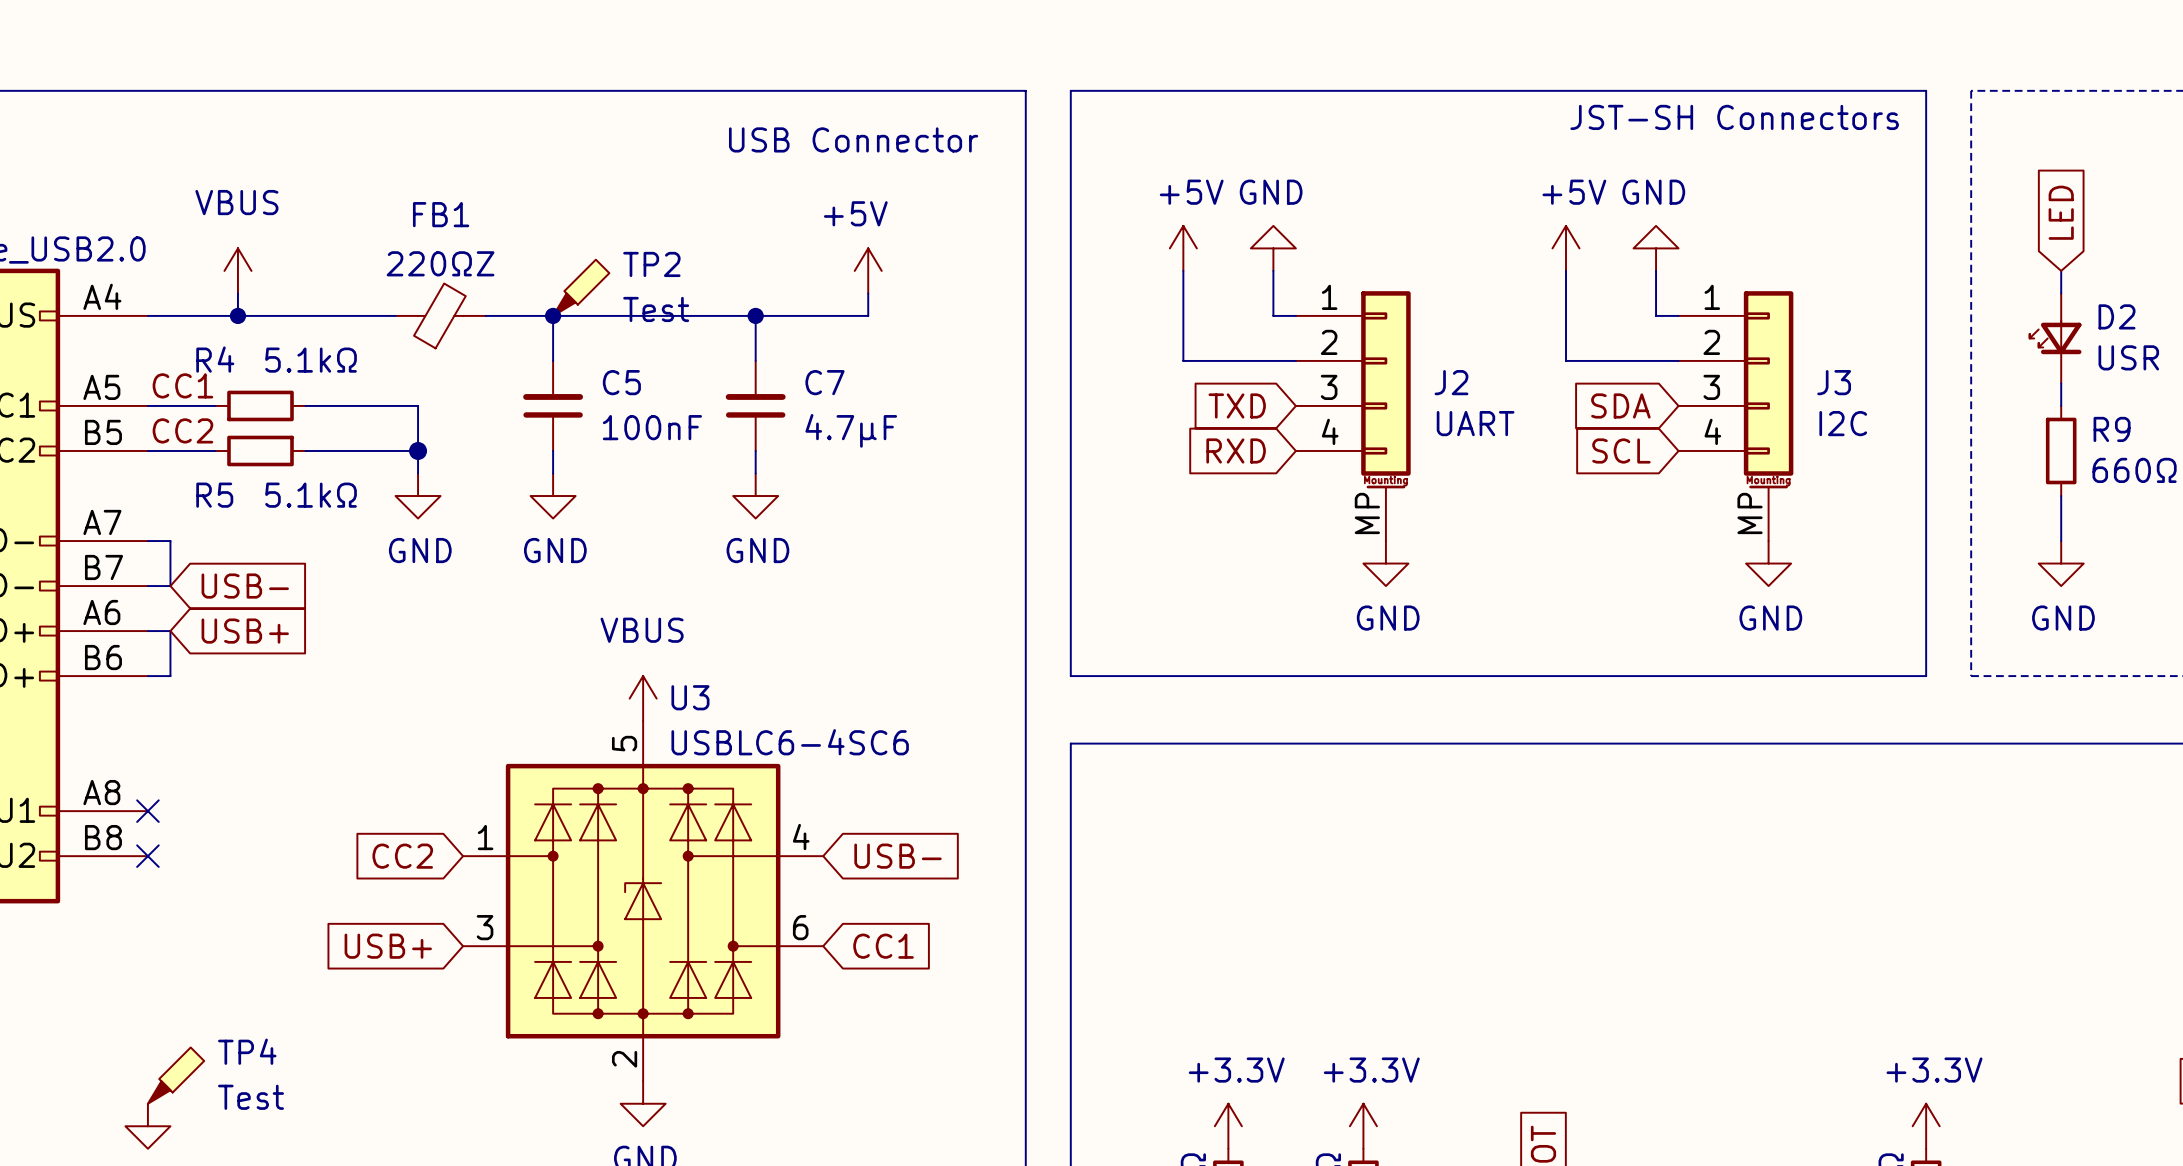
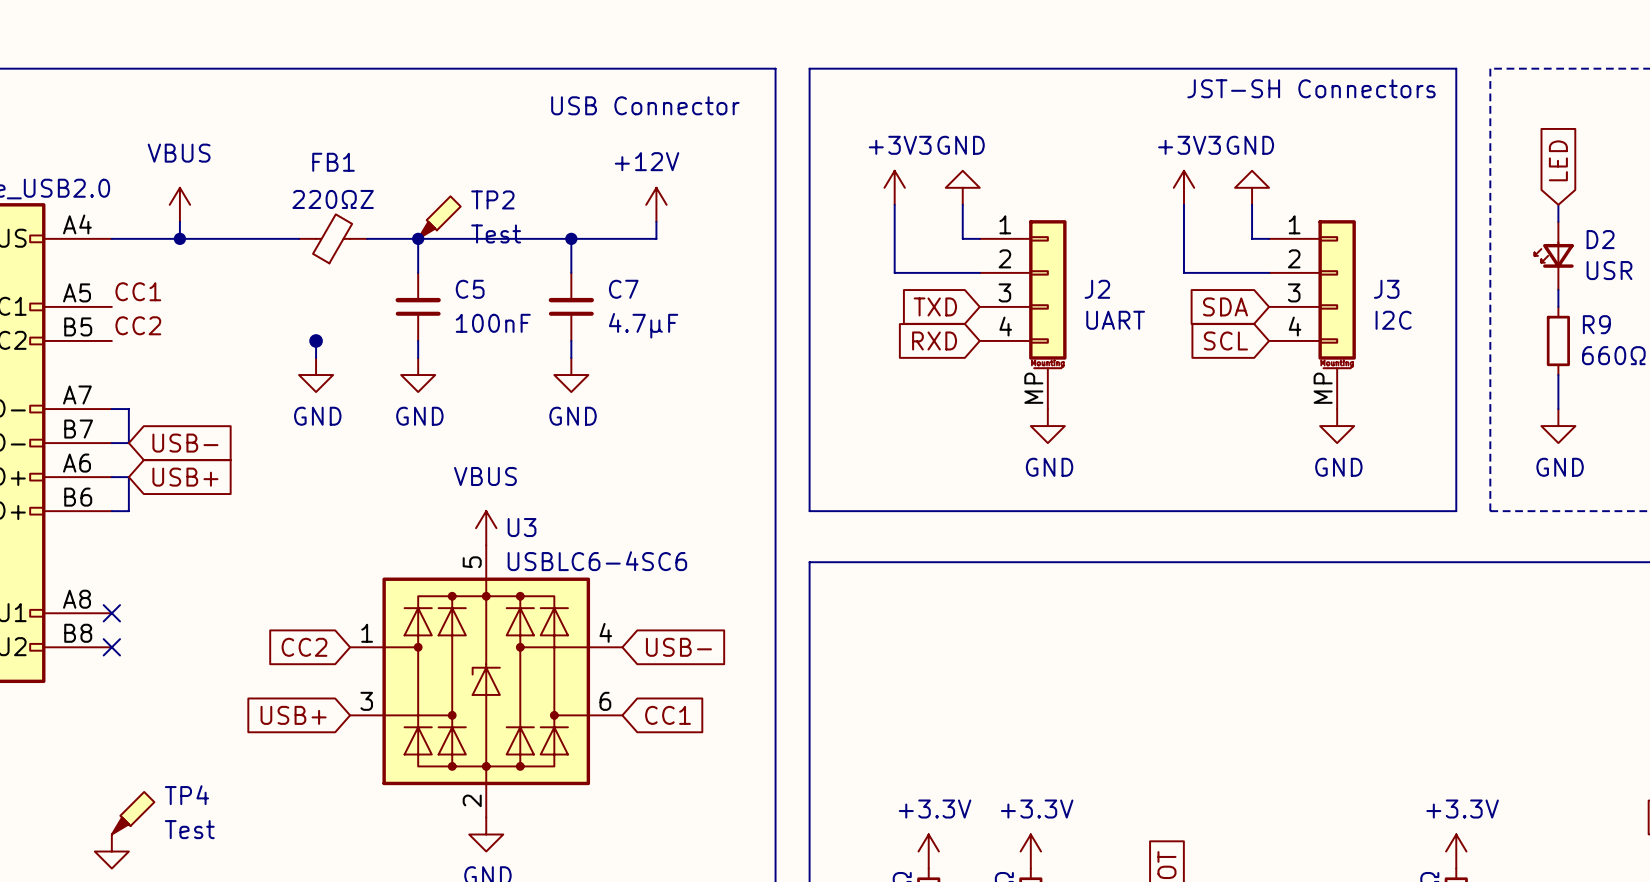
power symbol: +5V (1183, 248) -> +3V3 (894, 187)
power symbol: +5V (1566, 248) -> +3V3 (1183, 187)
power symbol: +5V (868, 270) -> +12V (656, 204)
wire: (147, 405) (215, 405) -> none
R4: 5.1kΩ (260, 405) -> none
wire: (305, 405) (418, 405) (418, 450) (305, 450) -> none
wire: (147, 450) (215, 450) -> none
R5: 5.1kΩ (260, 450) -> none

